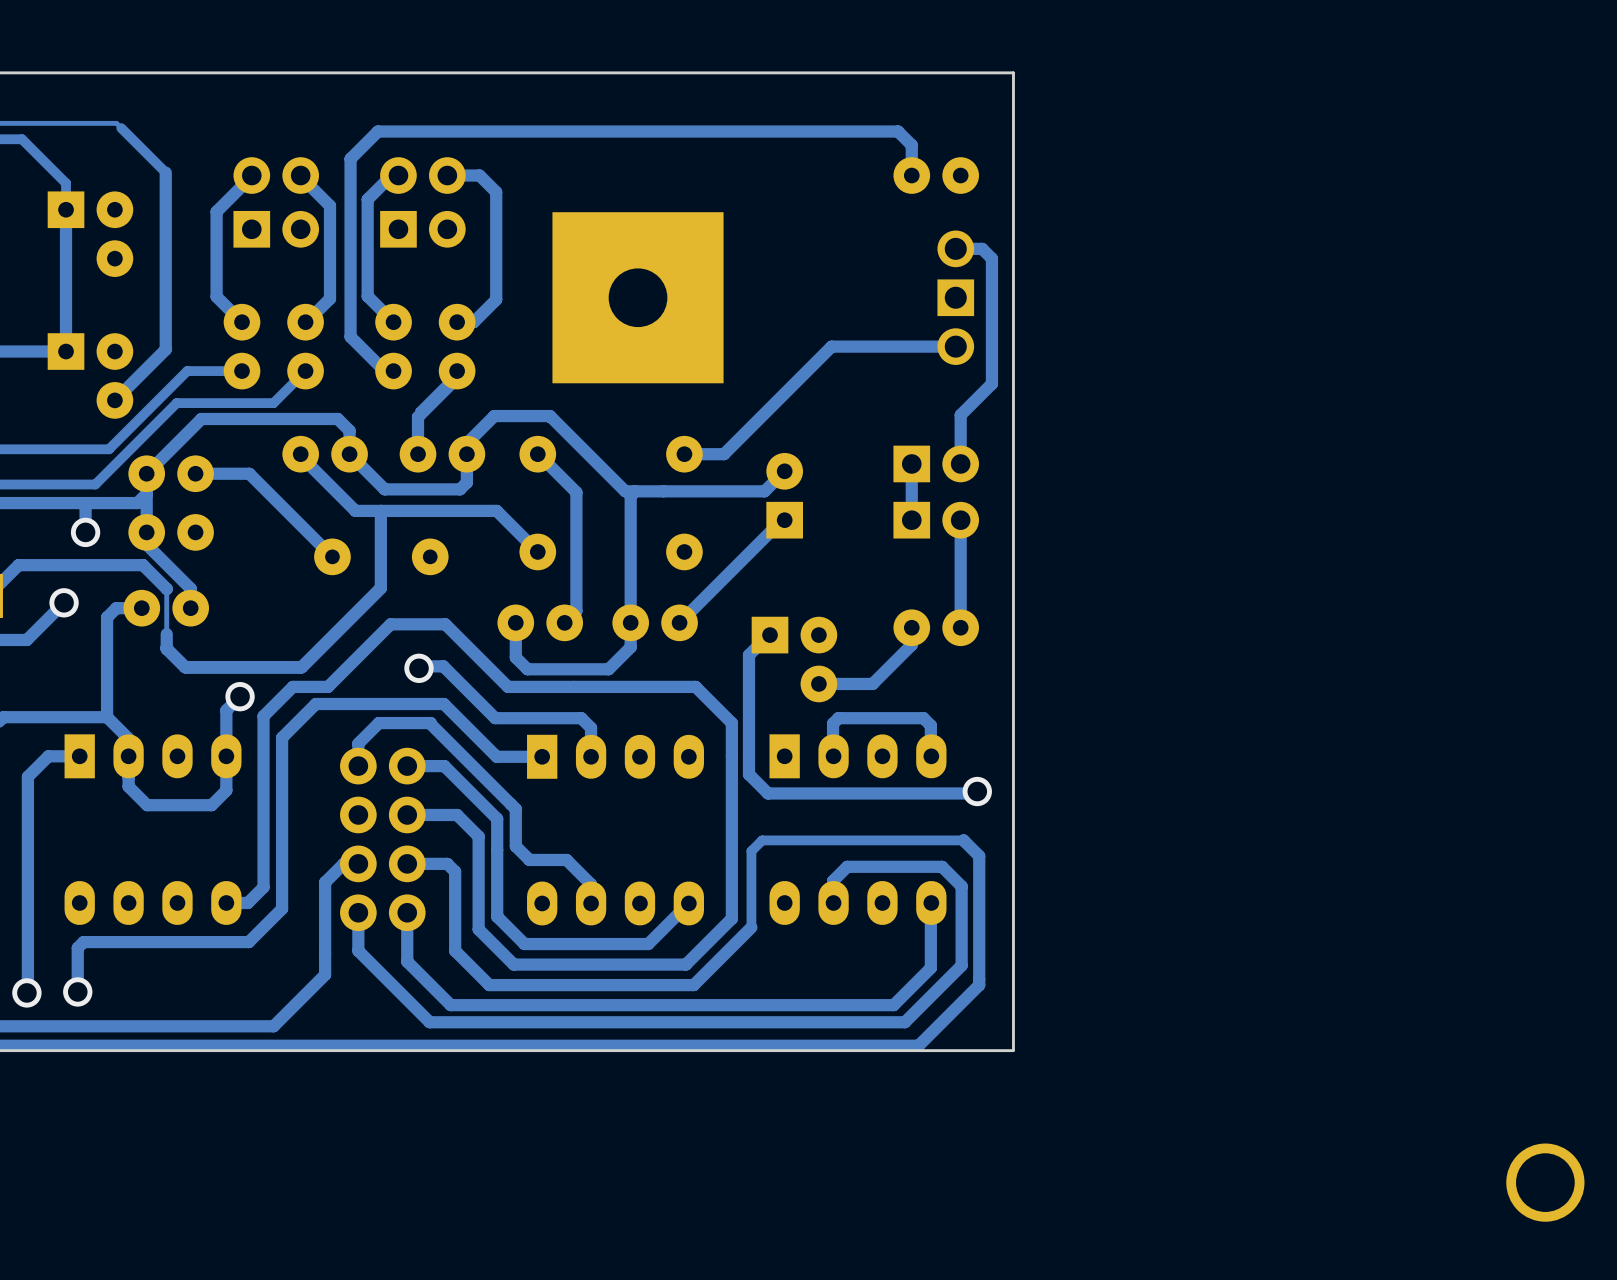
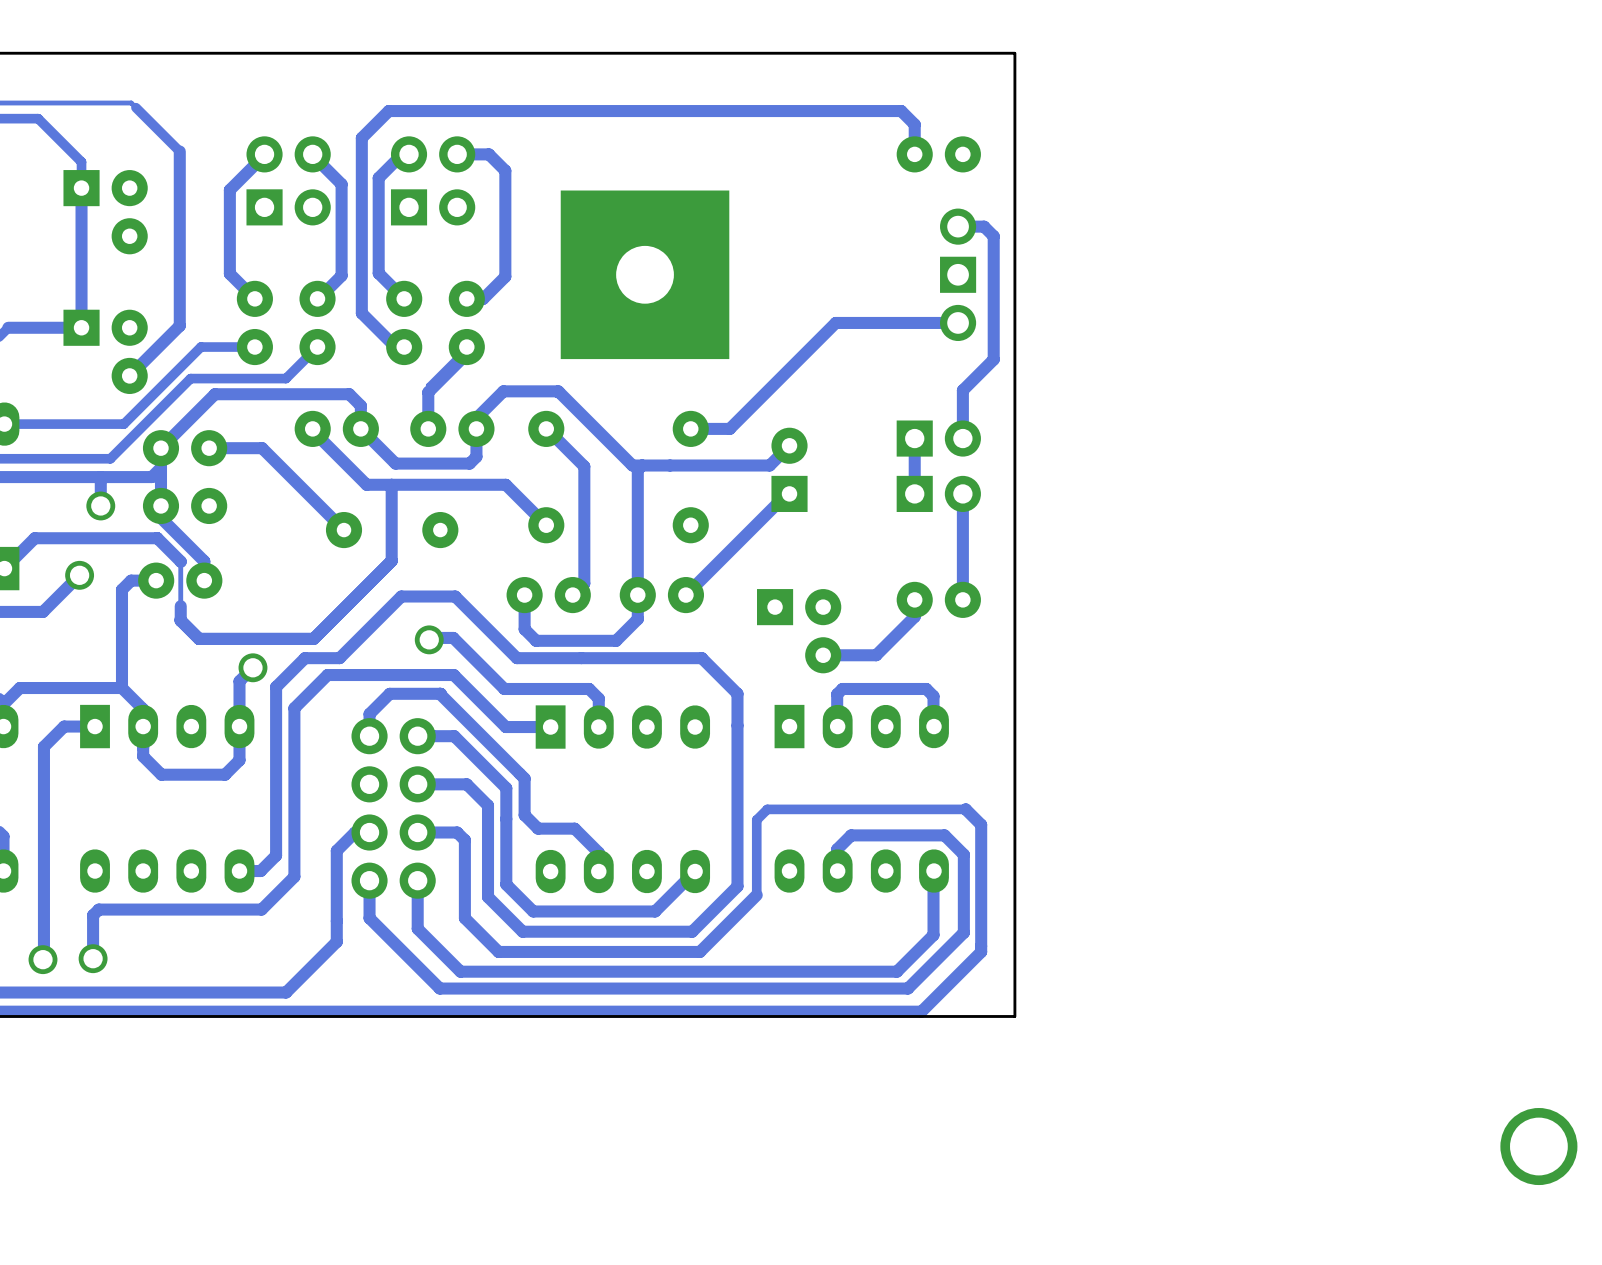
track: (770, 635) (748, 655) (748, 774) (768, 793) (975, 793) (977, 791) -> none
via: (977, 791) -> none

